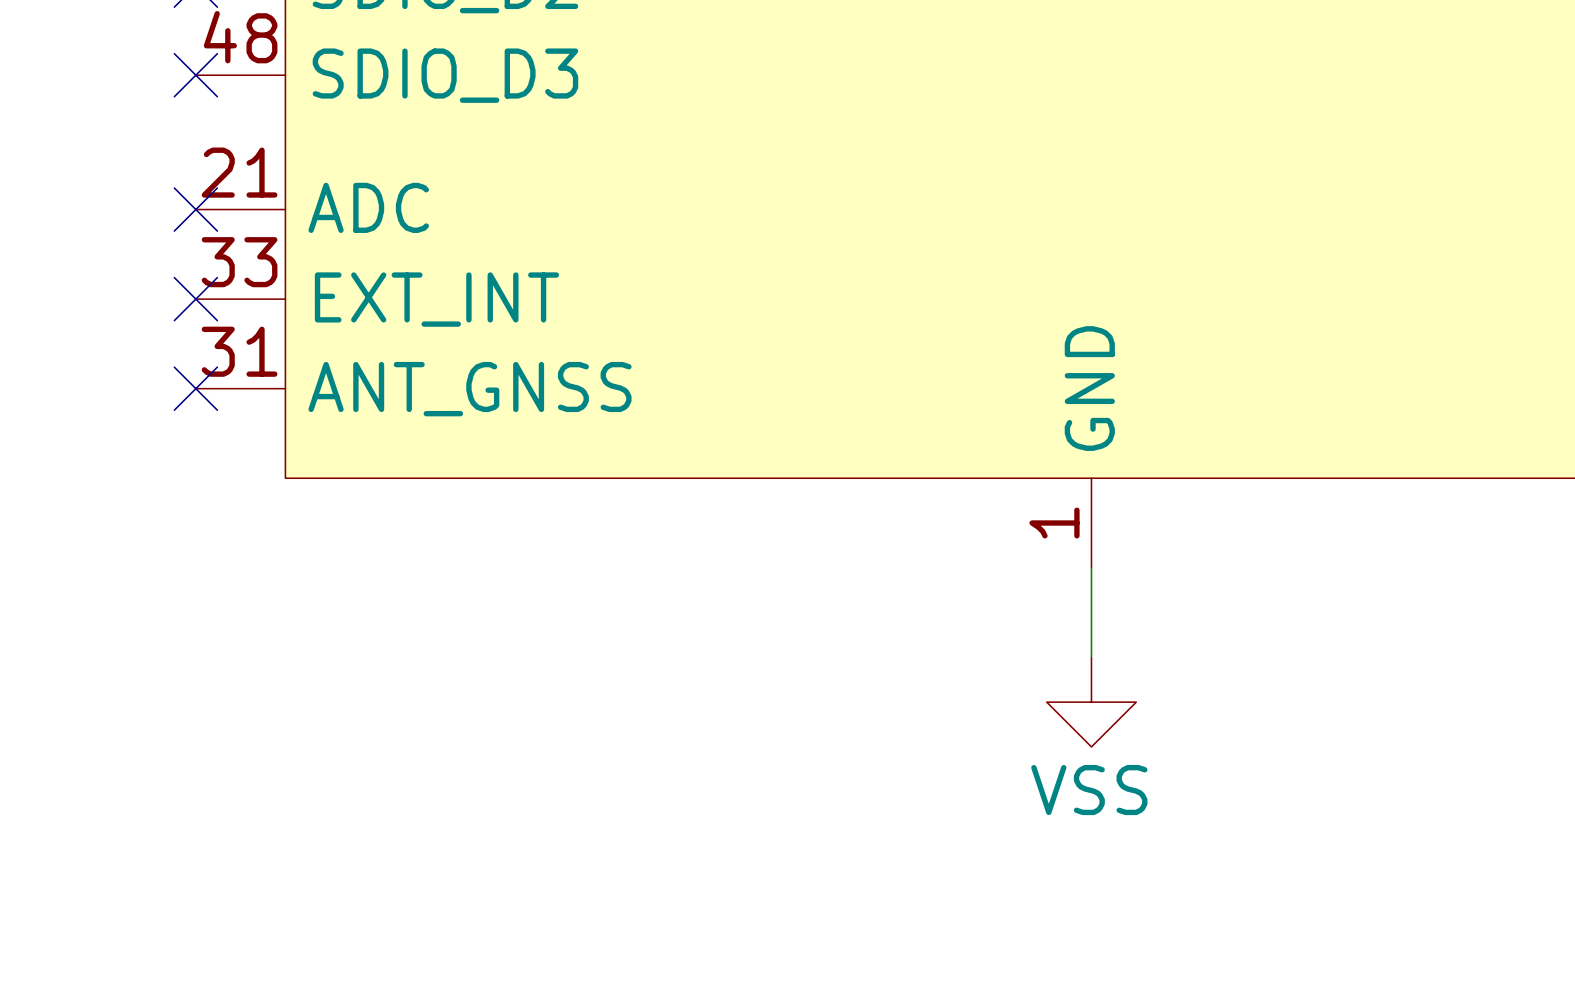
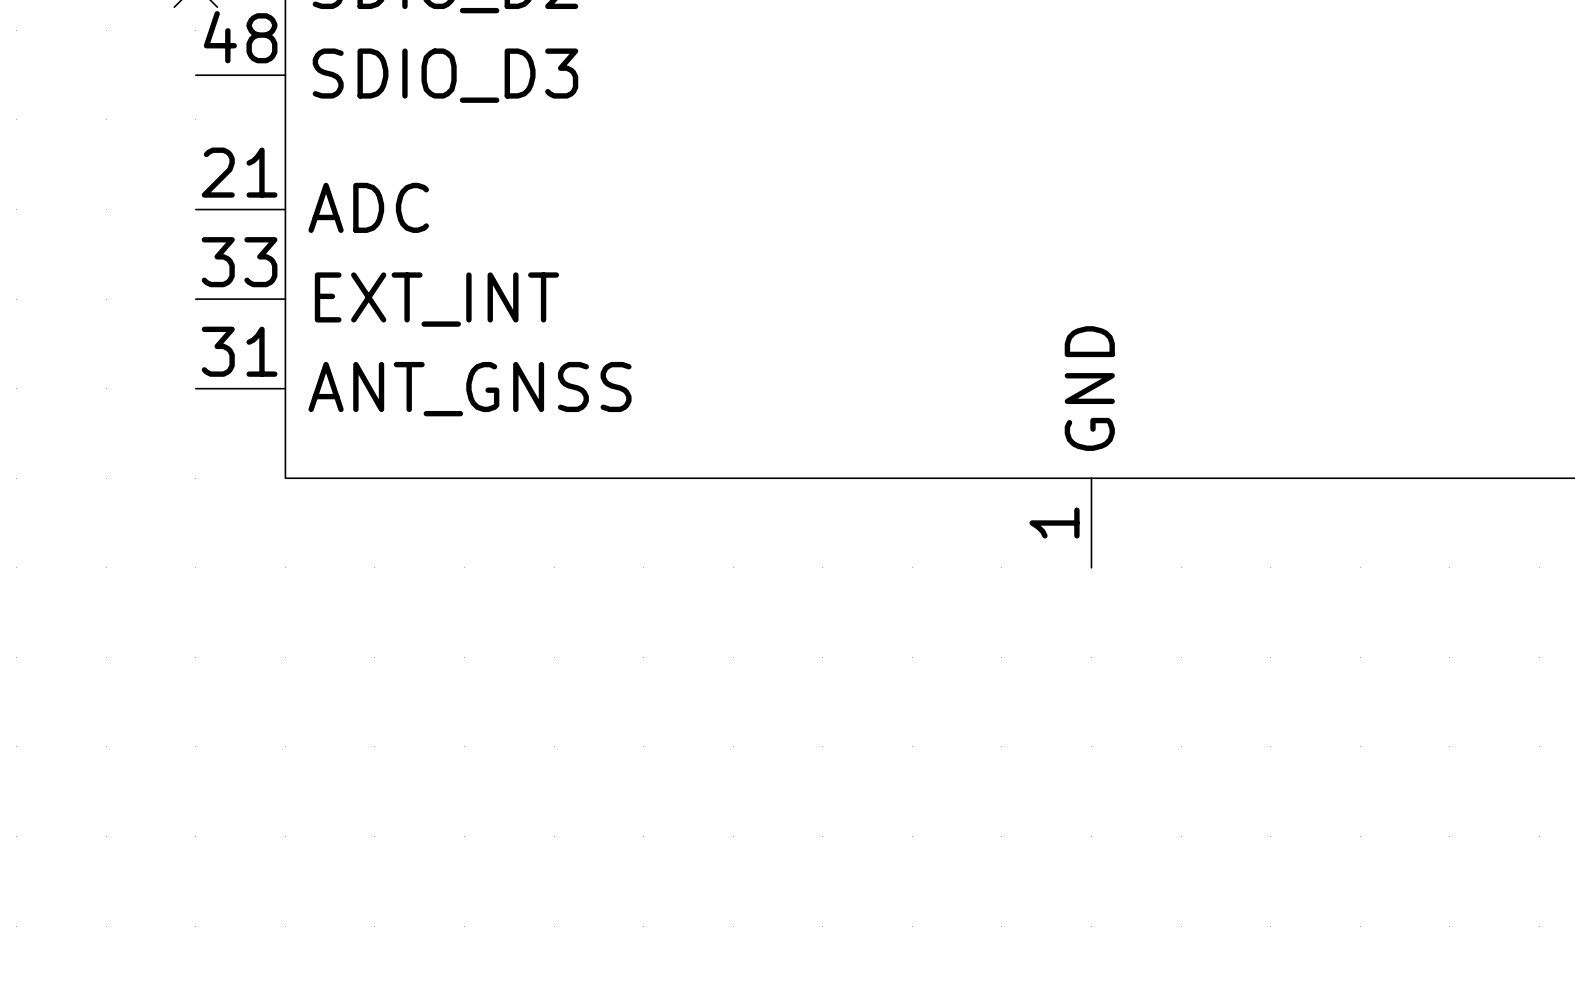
no-connect mark: (195, 75) -> none
no-connect mark: (195, 209) -> none
no-connect mark: (195, 299) -> none
no-connect mark: (195, 388) -> none
wire: (1091, 567) (1091, 657) -> none
power symbol: VSS (1091, 702) -> none

